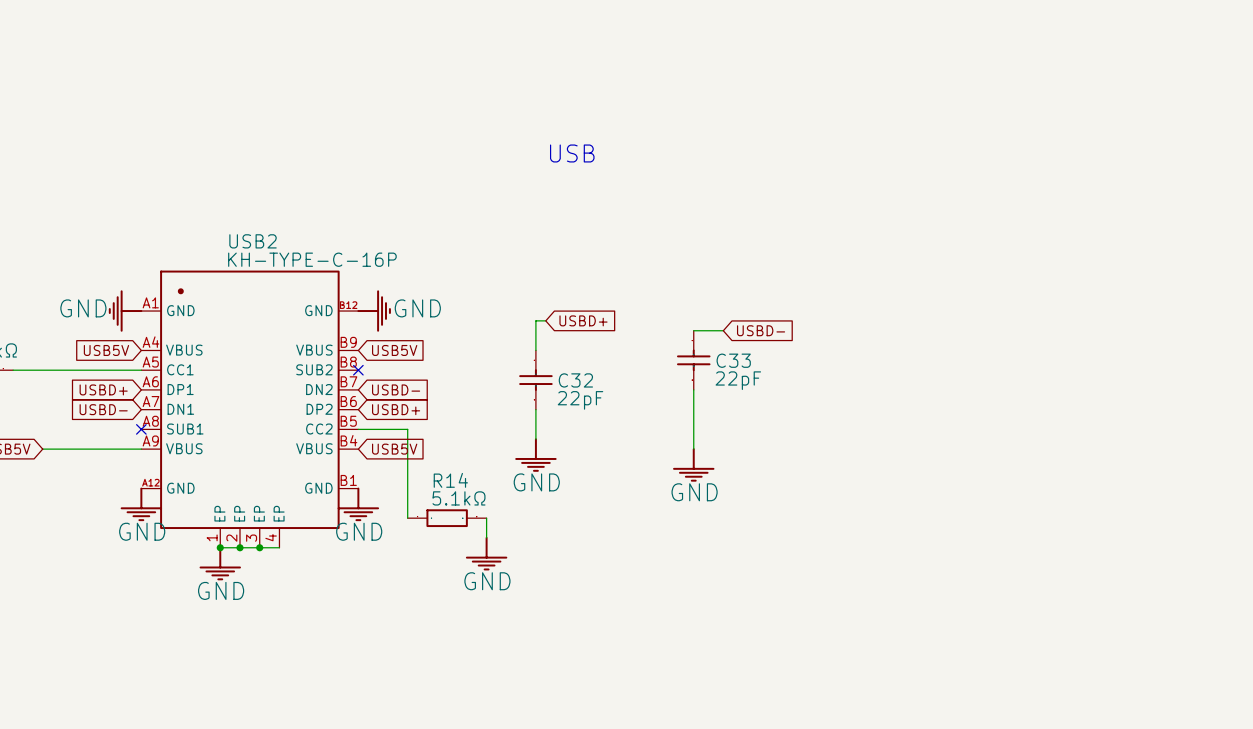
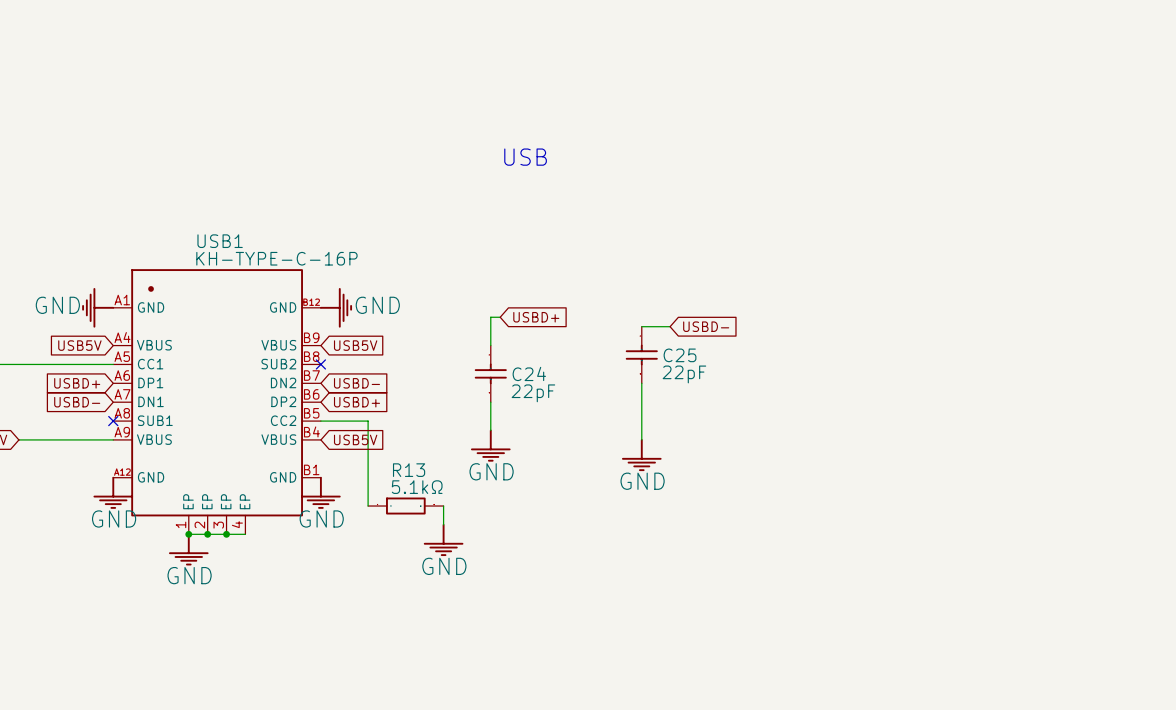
USB2 name: USB2 (253, 241) -> USB1 (220, 241)
C33 name: C33 (733, 360) -> C25 (680, 355)
C32 name: C32 (575, 380) -> C24 (529, 373)
R14 name: R14 (450, 480) -> R13 (409, 470)

